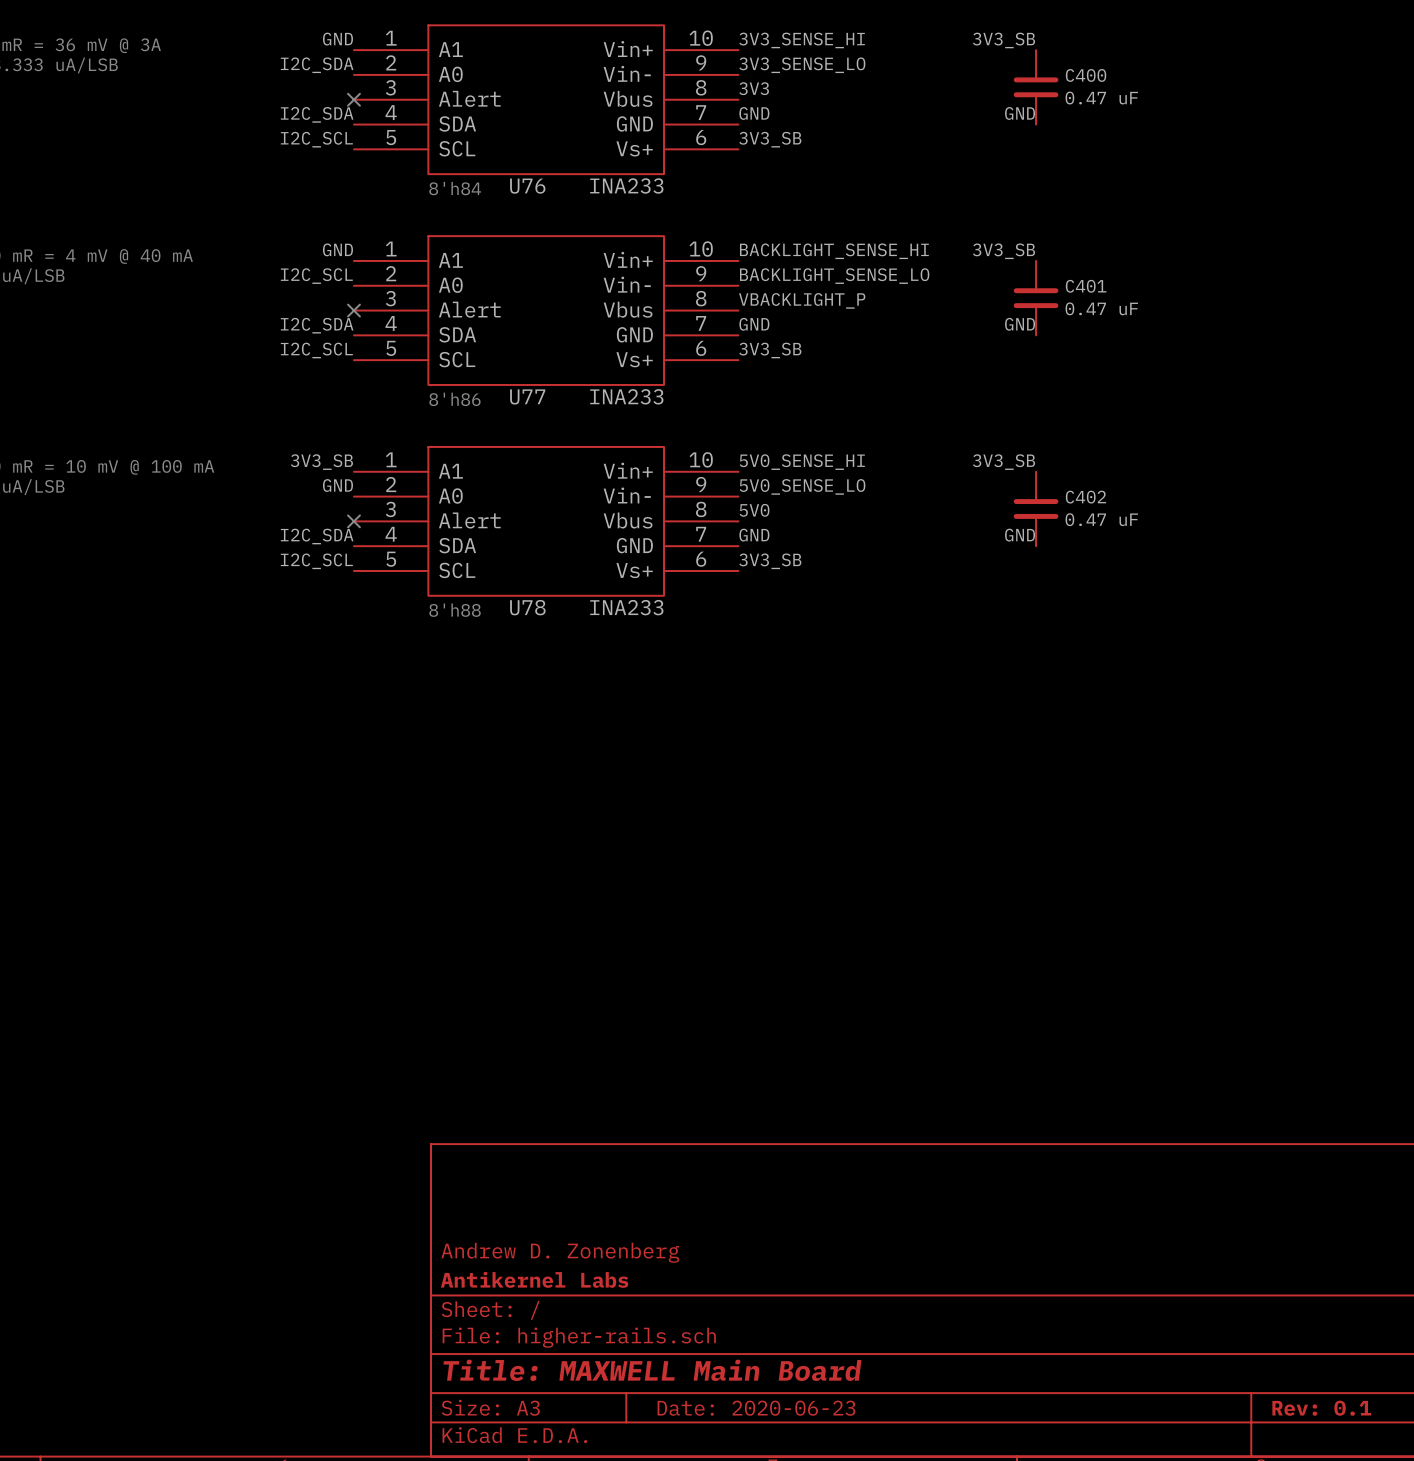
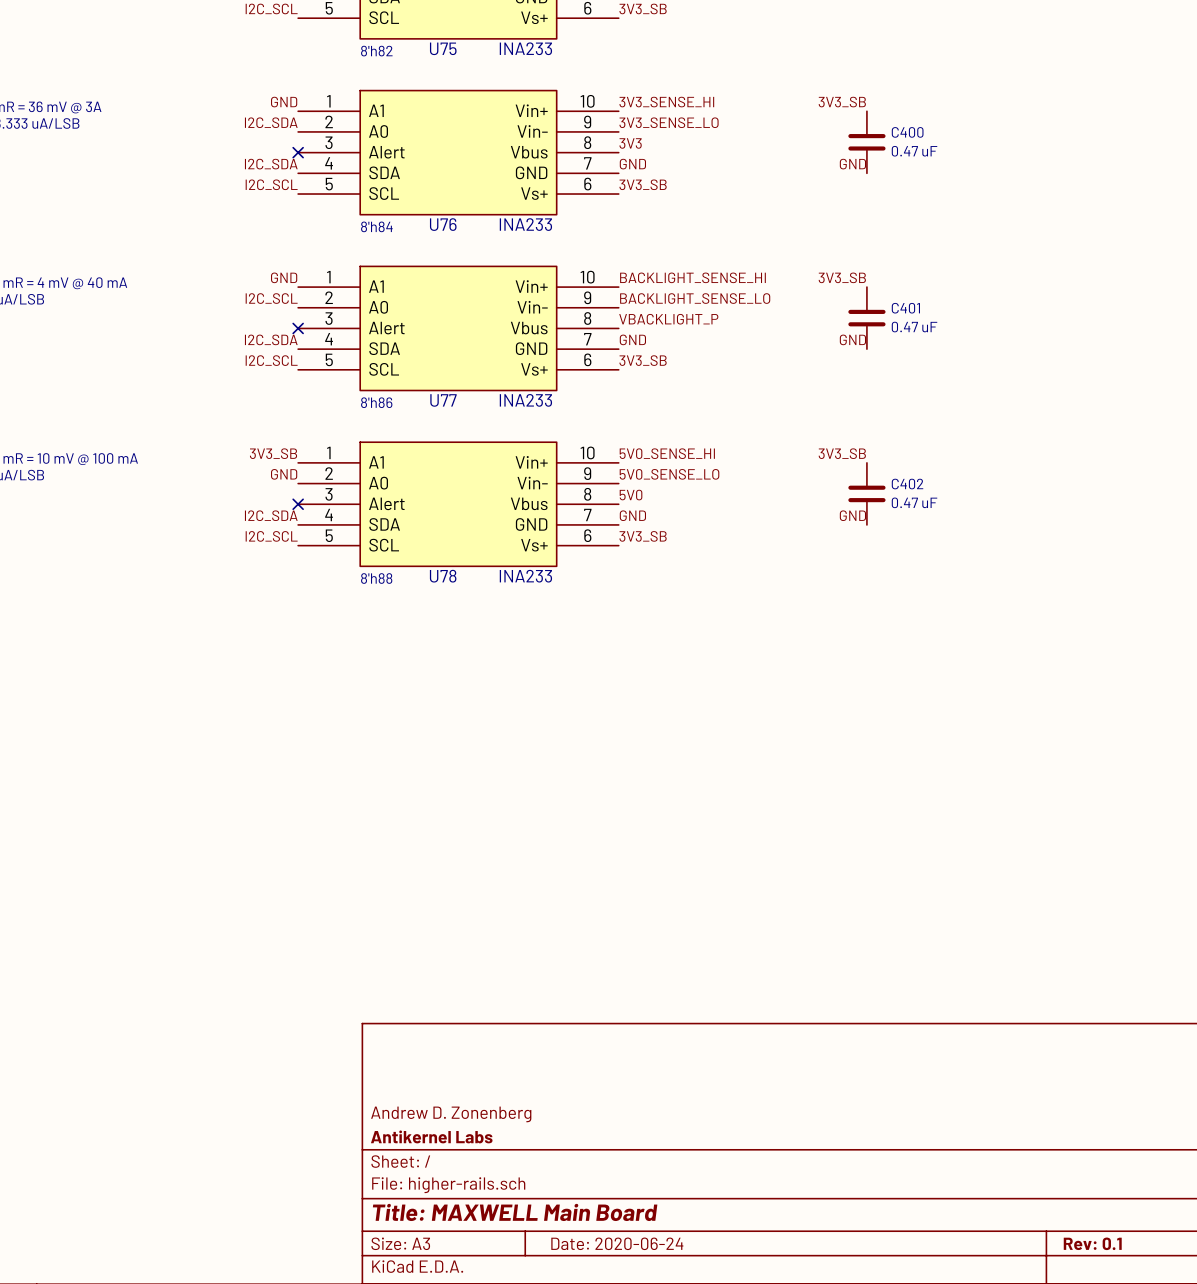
title block: Date: 2020-06-23 (756, 1408) -> Date: 2020-06-24 (617, 1243)

